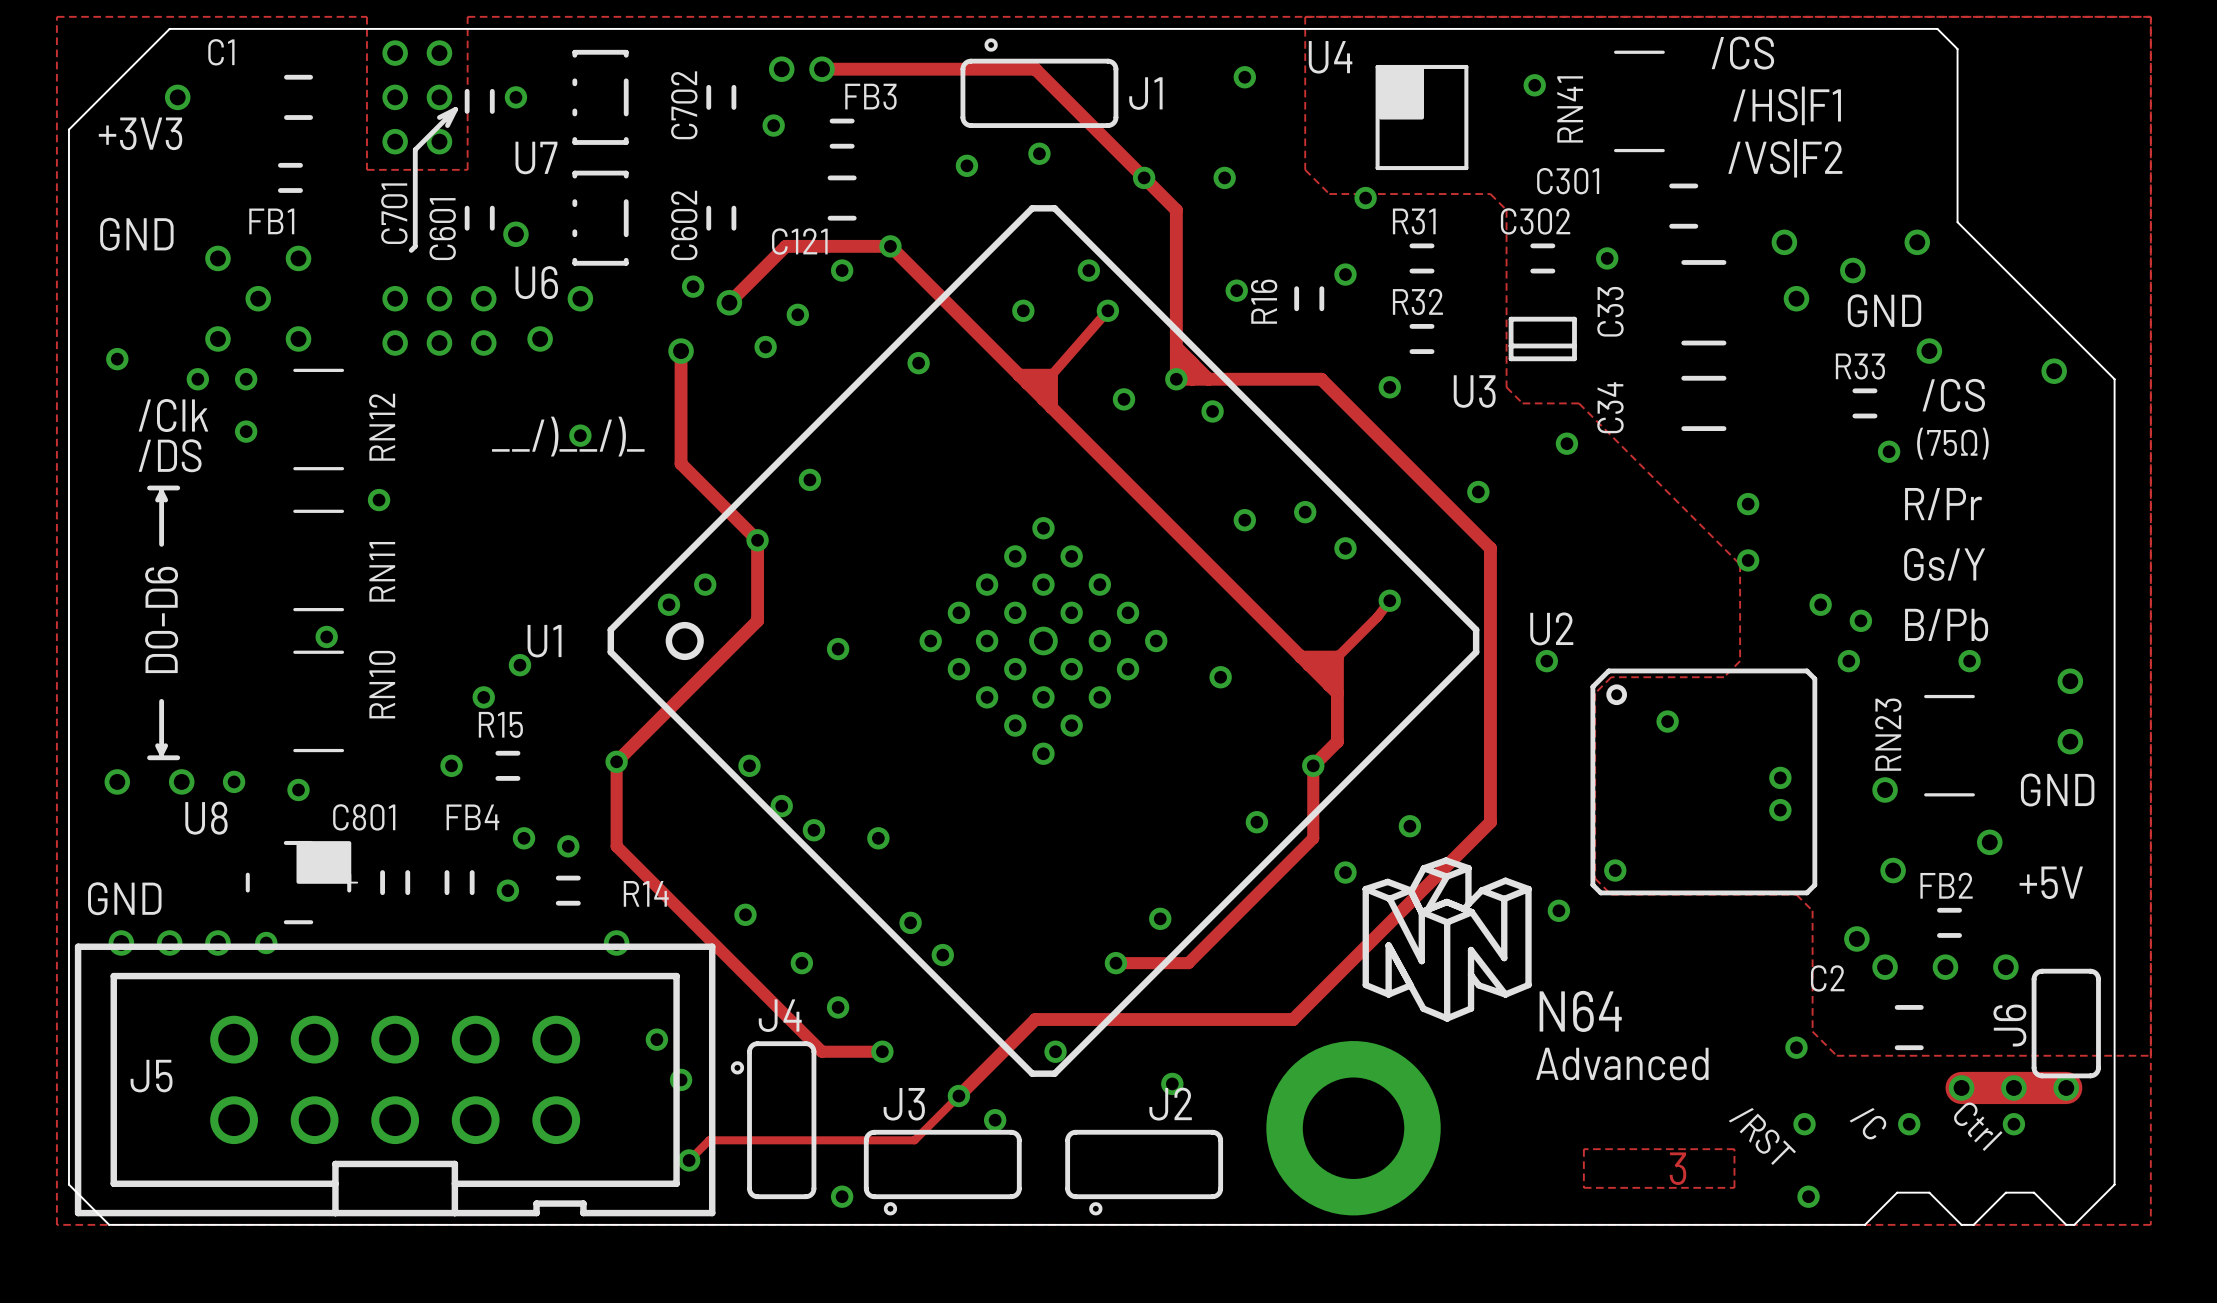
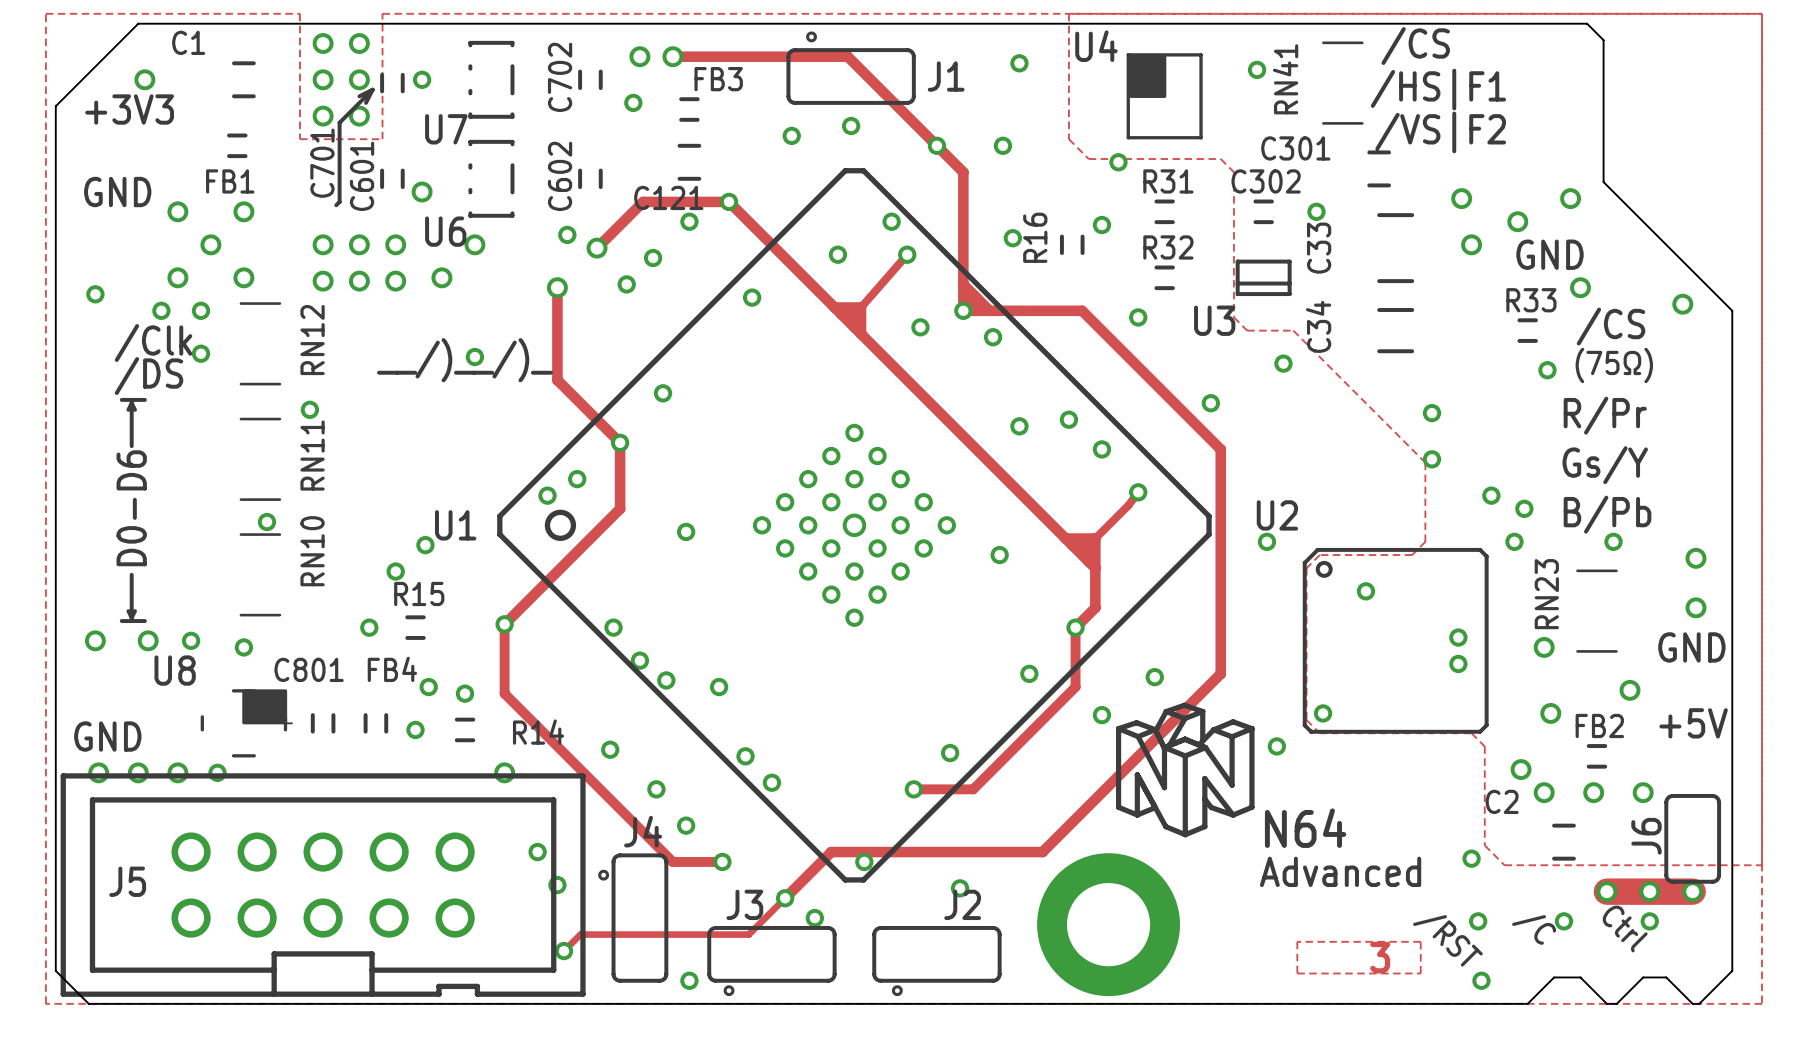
track: (1293, 1019) (1035, 1019) (1015, 1039) -> (1059, 835) (1042, 852) (831, 852)

